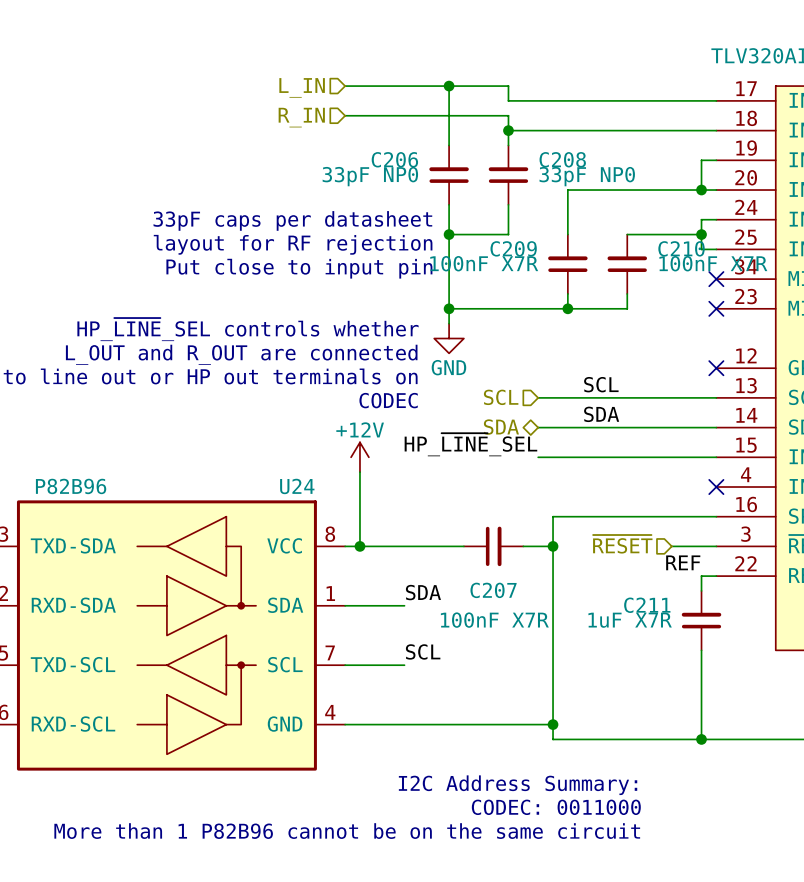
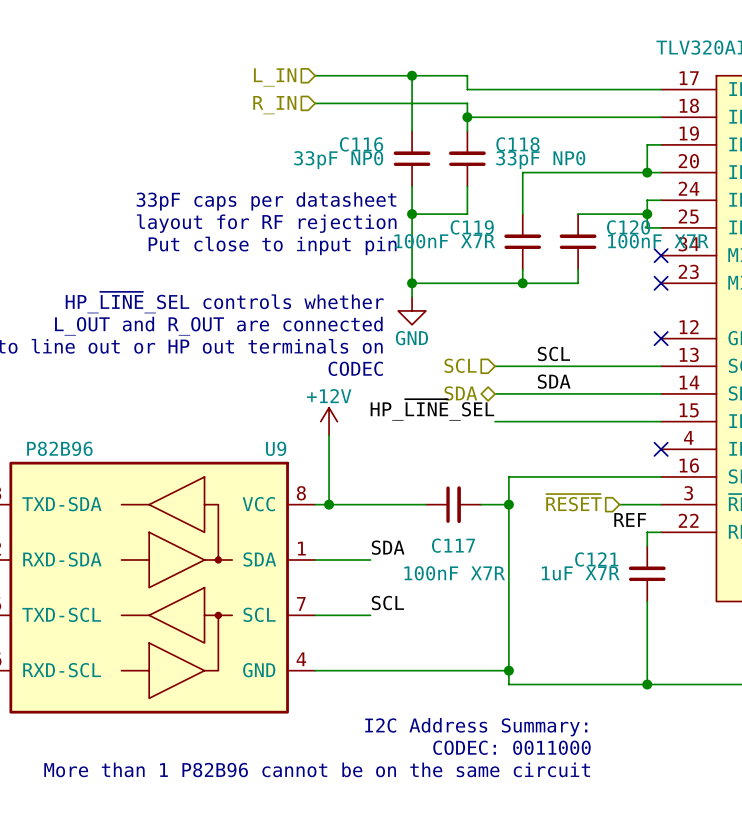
C206 name: C206 (394, 159) -> C116 (361, 144)
C208 name: C208 (562, 159) -> C118 (517, 144)
C209 name: C209 (513, 248) -> C119 (472, 227)
C210 name: C210 (681, 248) -> C120 (628, 227)
U24 name: U24 (297, 486) -> U9 (276, 448)
C207 name: C207 (493, 590) -> C117 (453, 545)
C211 name: C211 (647, 605) -> C121 (596, 559)

